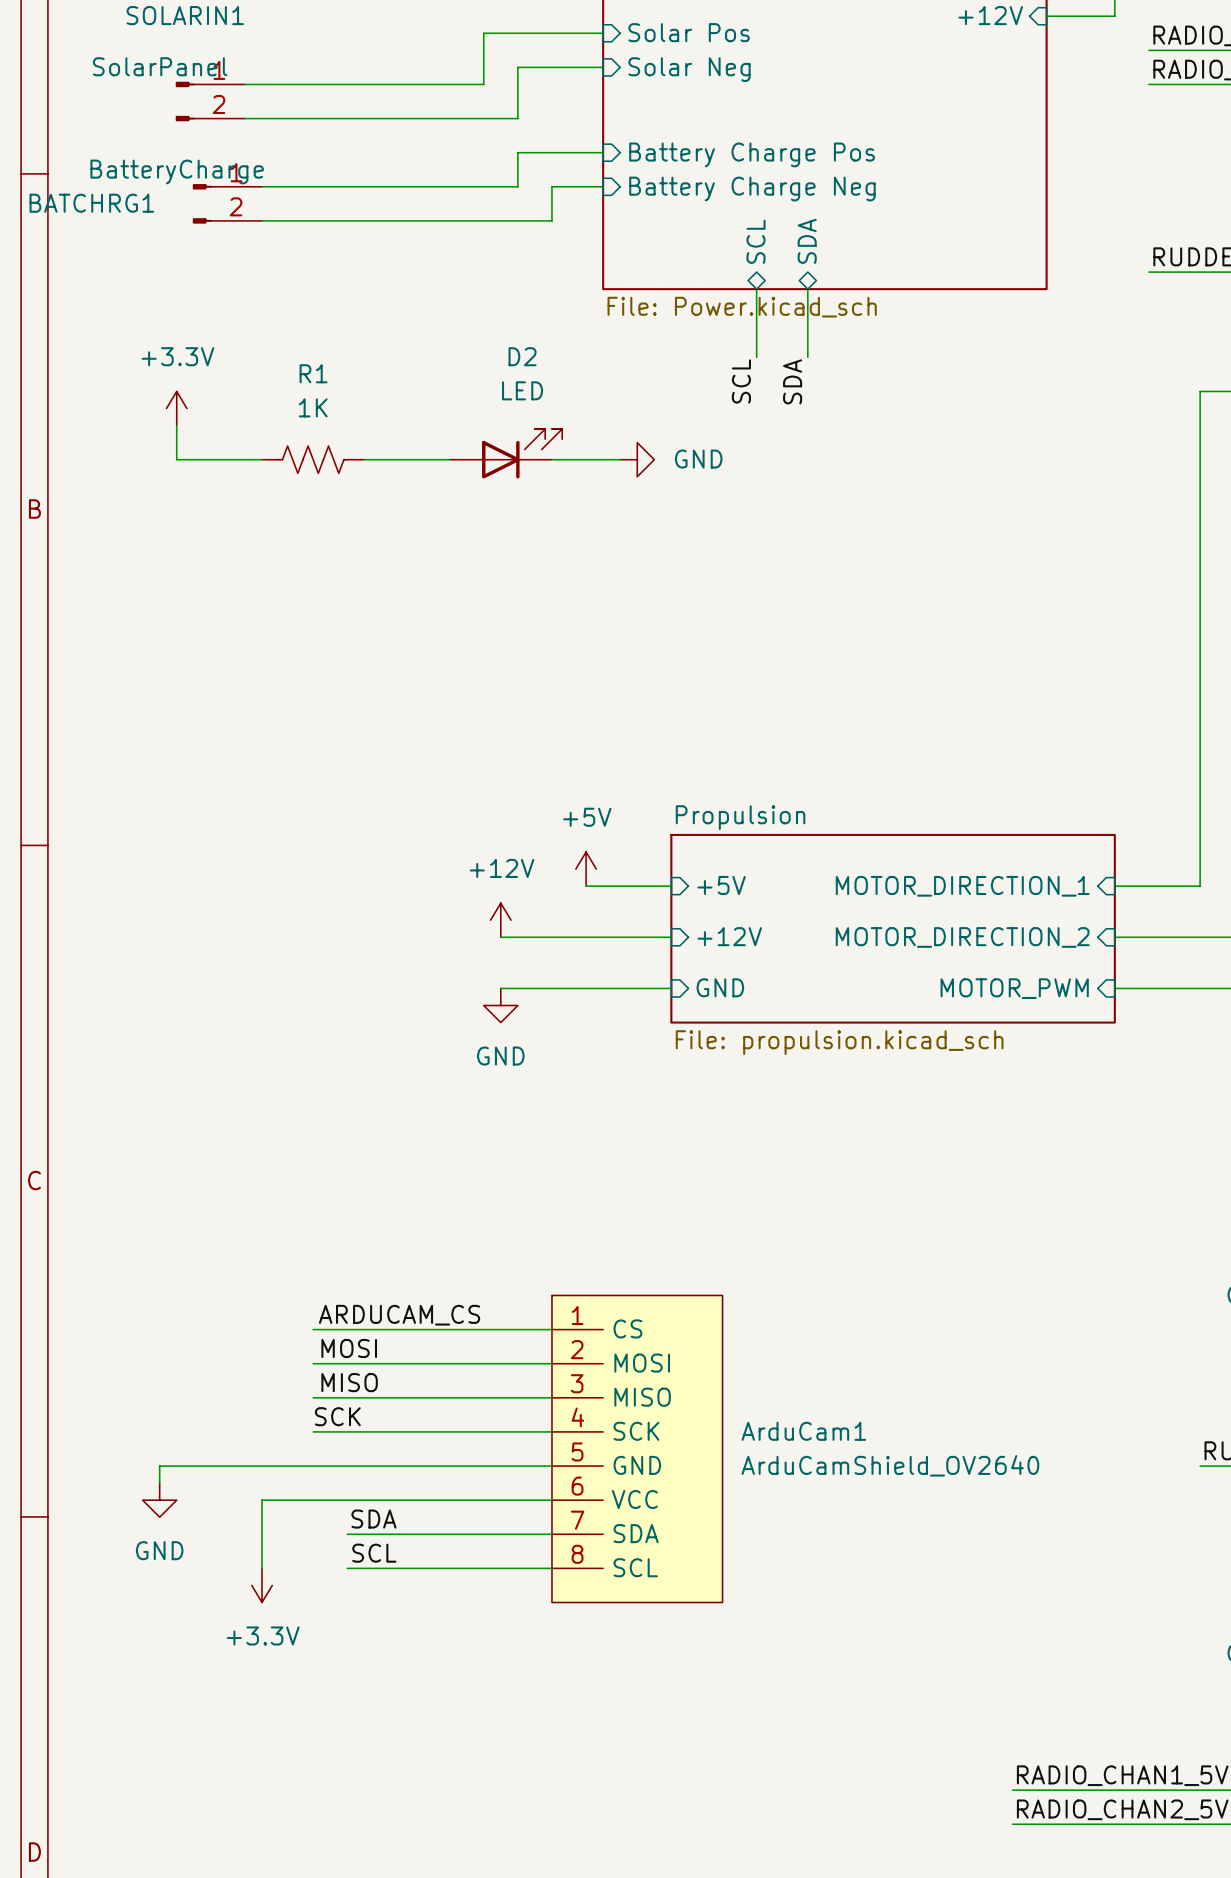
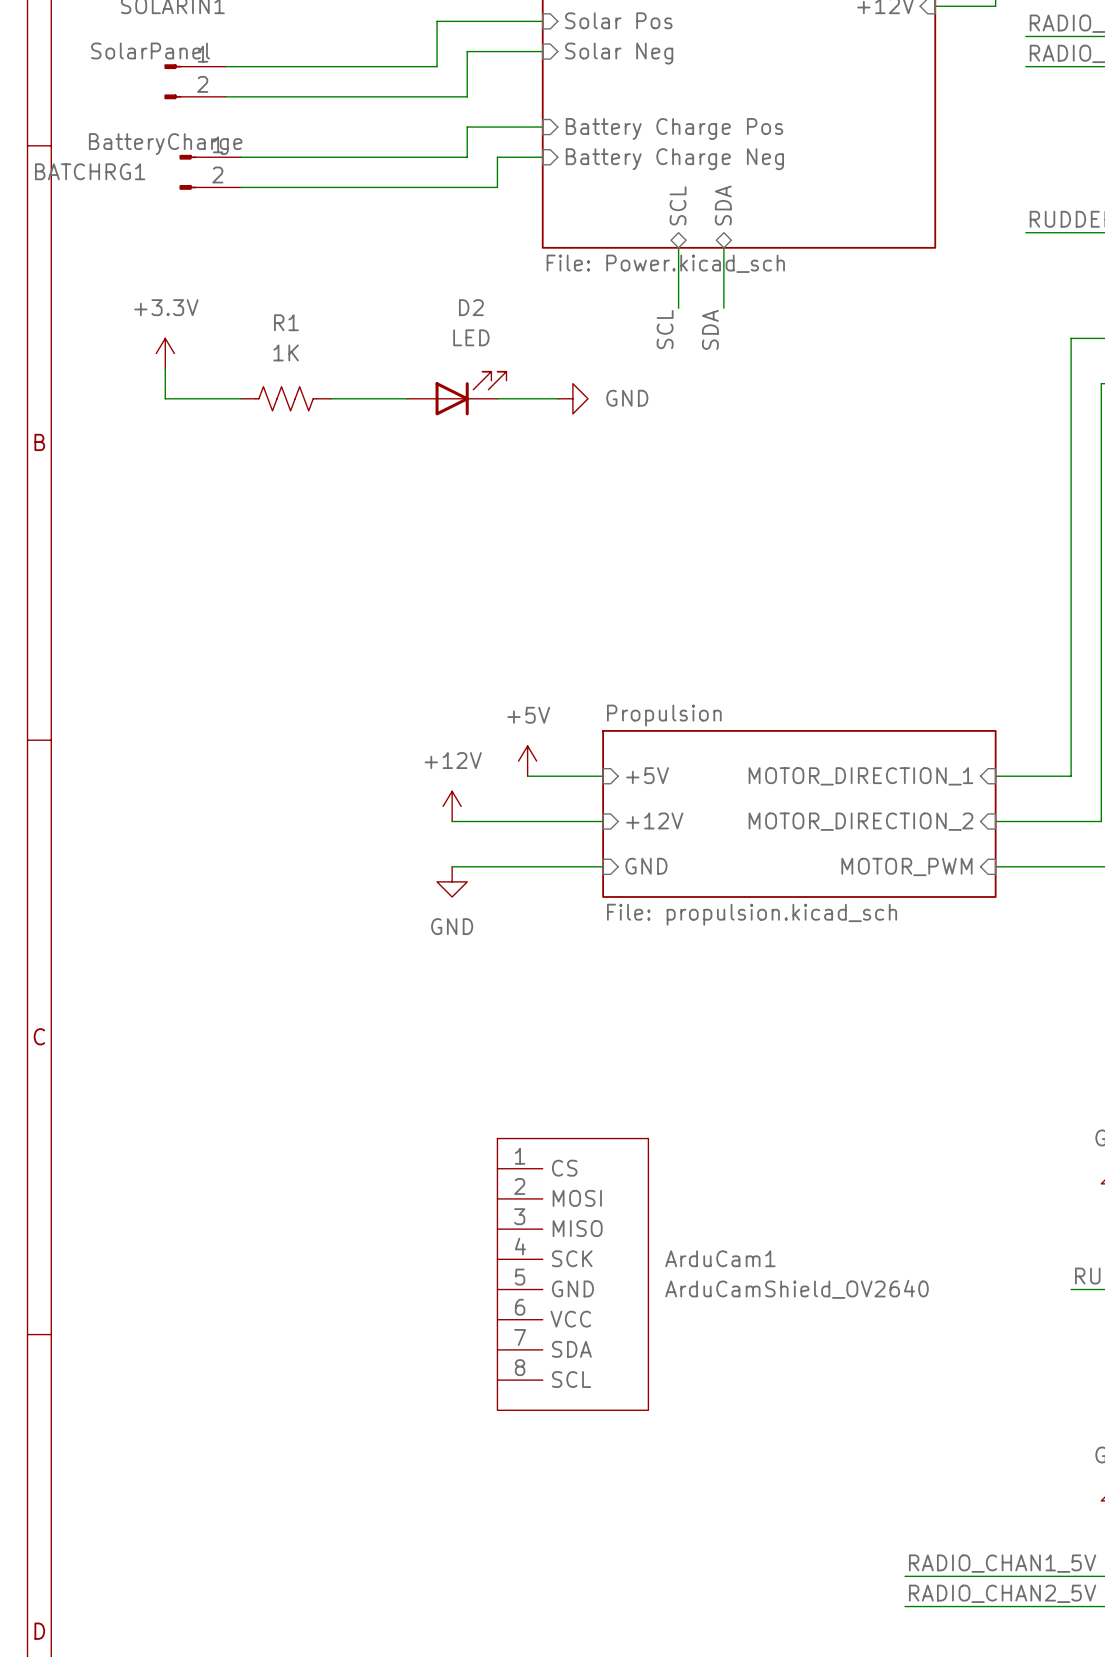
label: ARDUCAM_CS (399, 1315) -> none
wire: (313, 1329) (551, 1329) -> none
label: MOSI (349, 1348) -> none
wire: (313, 1363) (551, 1363) -> none
label: MISO (349, 1382) -> none
wire: (313, 1397) (551, 1397) -> none
label: SCK (337, 1416) -> none
wire: (313, 1431) (551, 1431) -> none
wire: (551, 1466) (159, 1466) (159, 1483) -> none
power symbol: GND (159, 1500) -> none
wire: (551, 1500) (262, 1500) (262, 1568) -> none
label: SDA (373, 1519) -> none
wire: (347, 1534) (551, 1534) -> none
label: SCL (374, 1553) -> none
wire: (347, 1568) (551, 1568) -> none
power symbol: +3.3V (262, 1585) -> none

